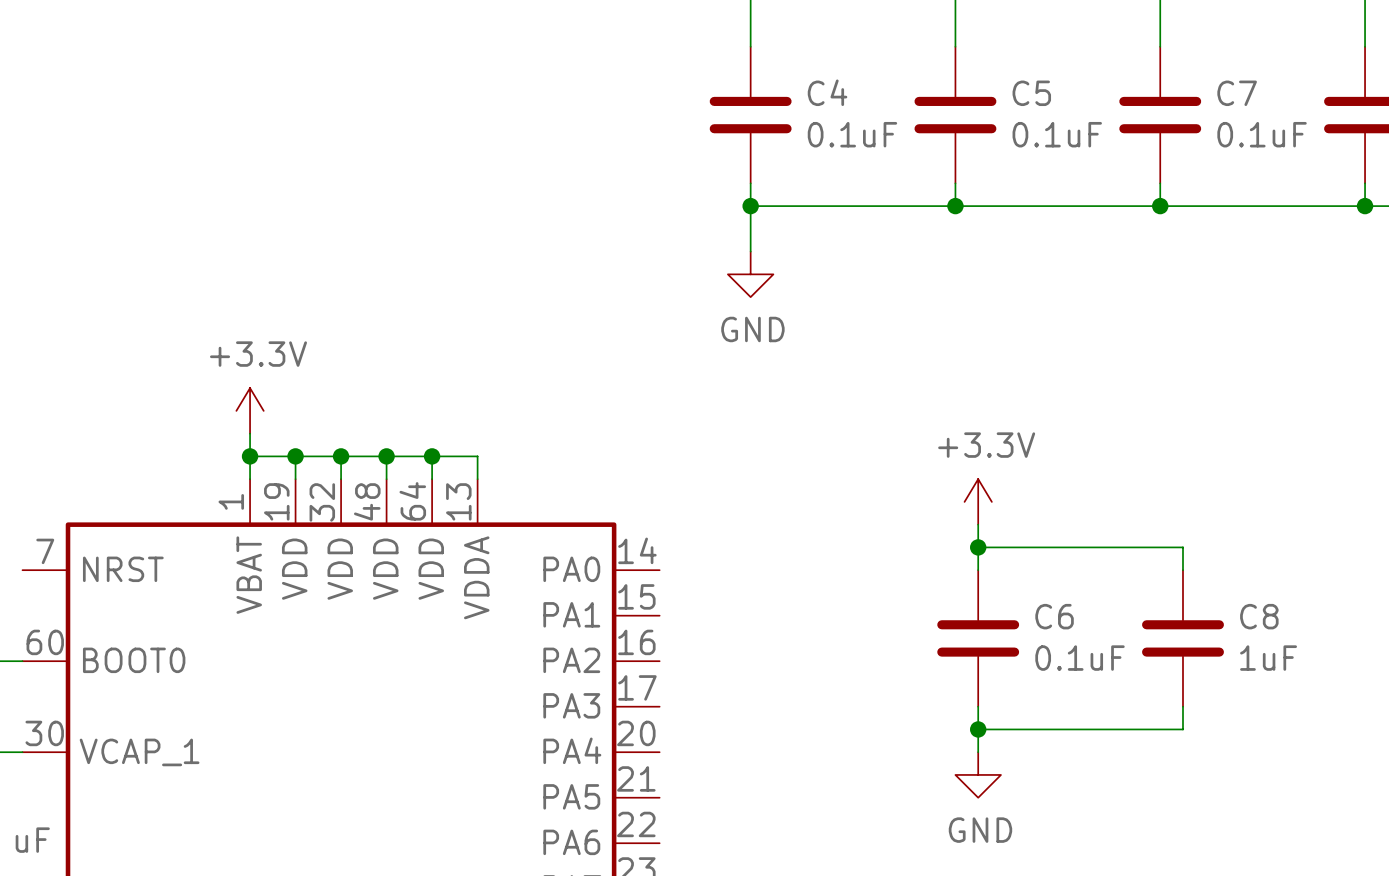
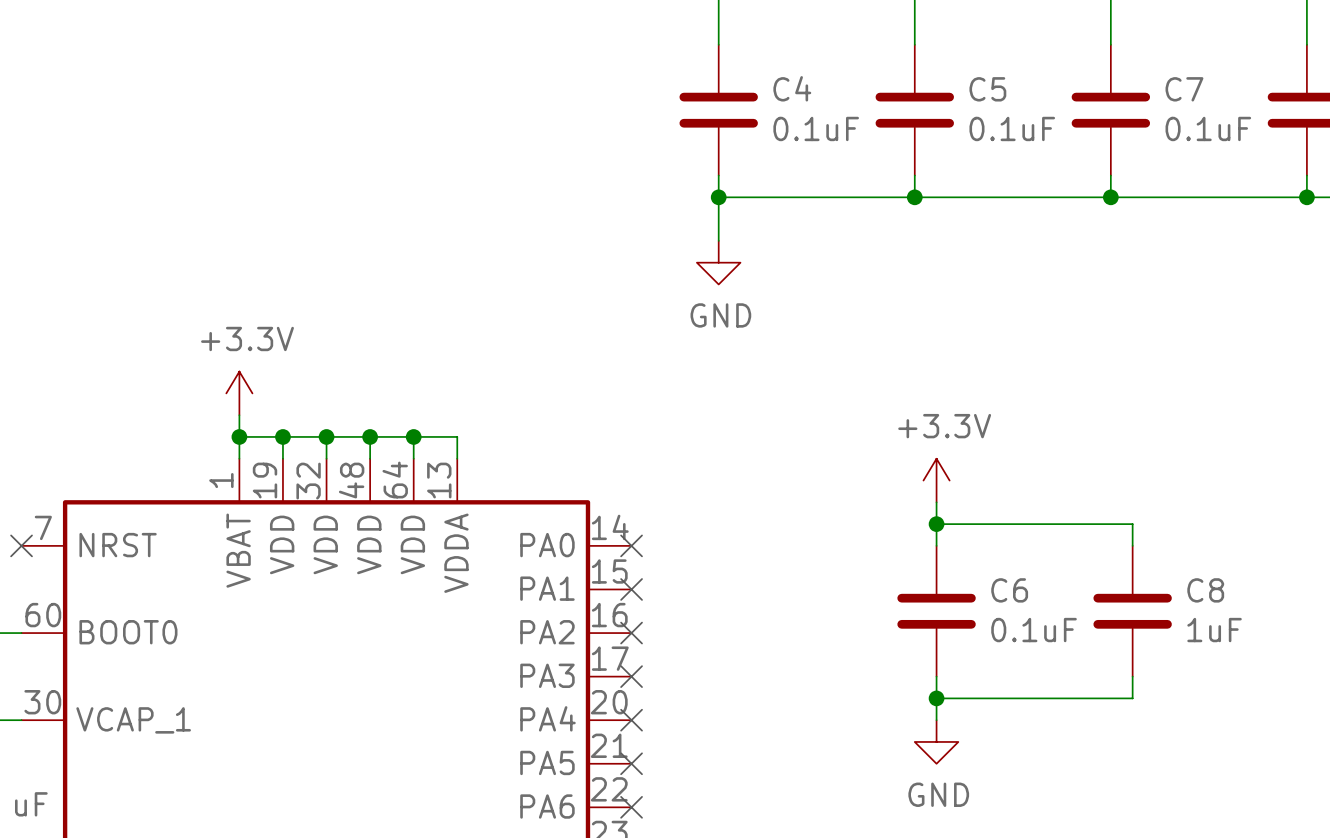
no-connect mark: none -> (21, 545)
no-connect mark: none -> (631, 545)
no-connect mark: none -> (631, 589)
no-connect mark: none -> (631, 633)
no-connect mark: none -> (631, 676)
no-connect mark: none -> (631, 720)
no-connect mark: none -> (631, 763)
no-connect mark: none -> (631, 807)

